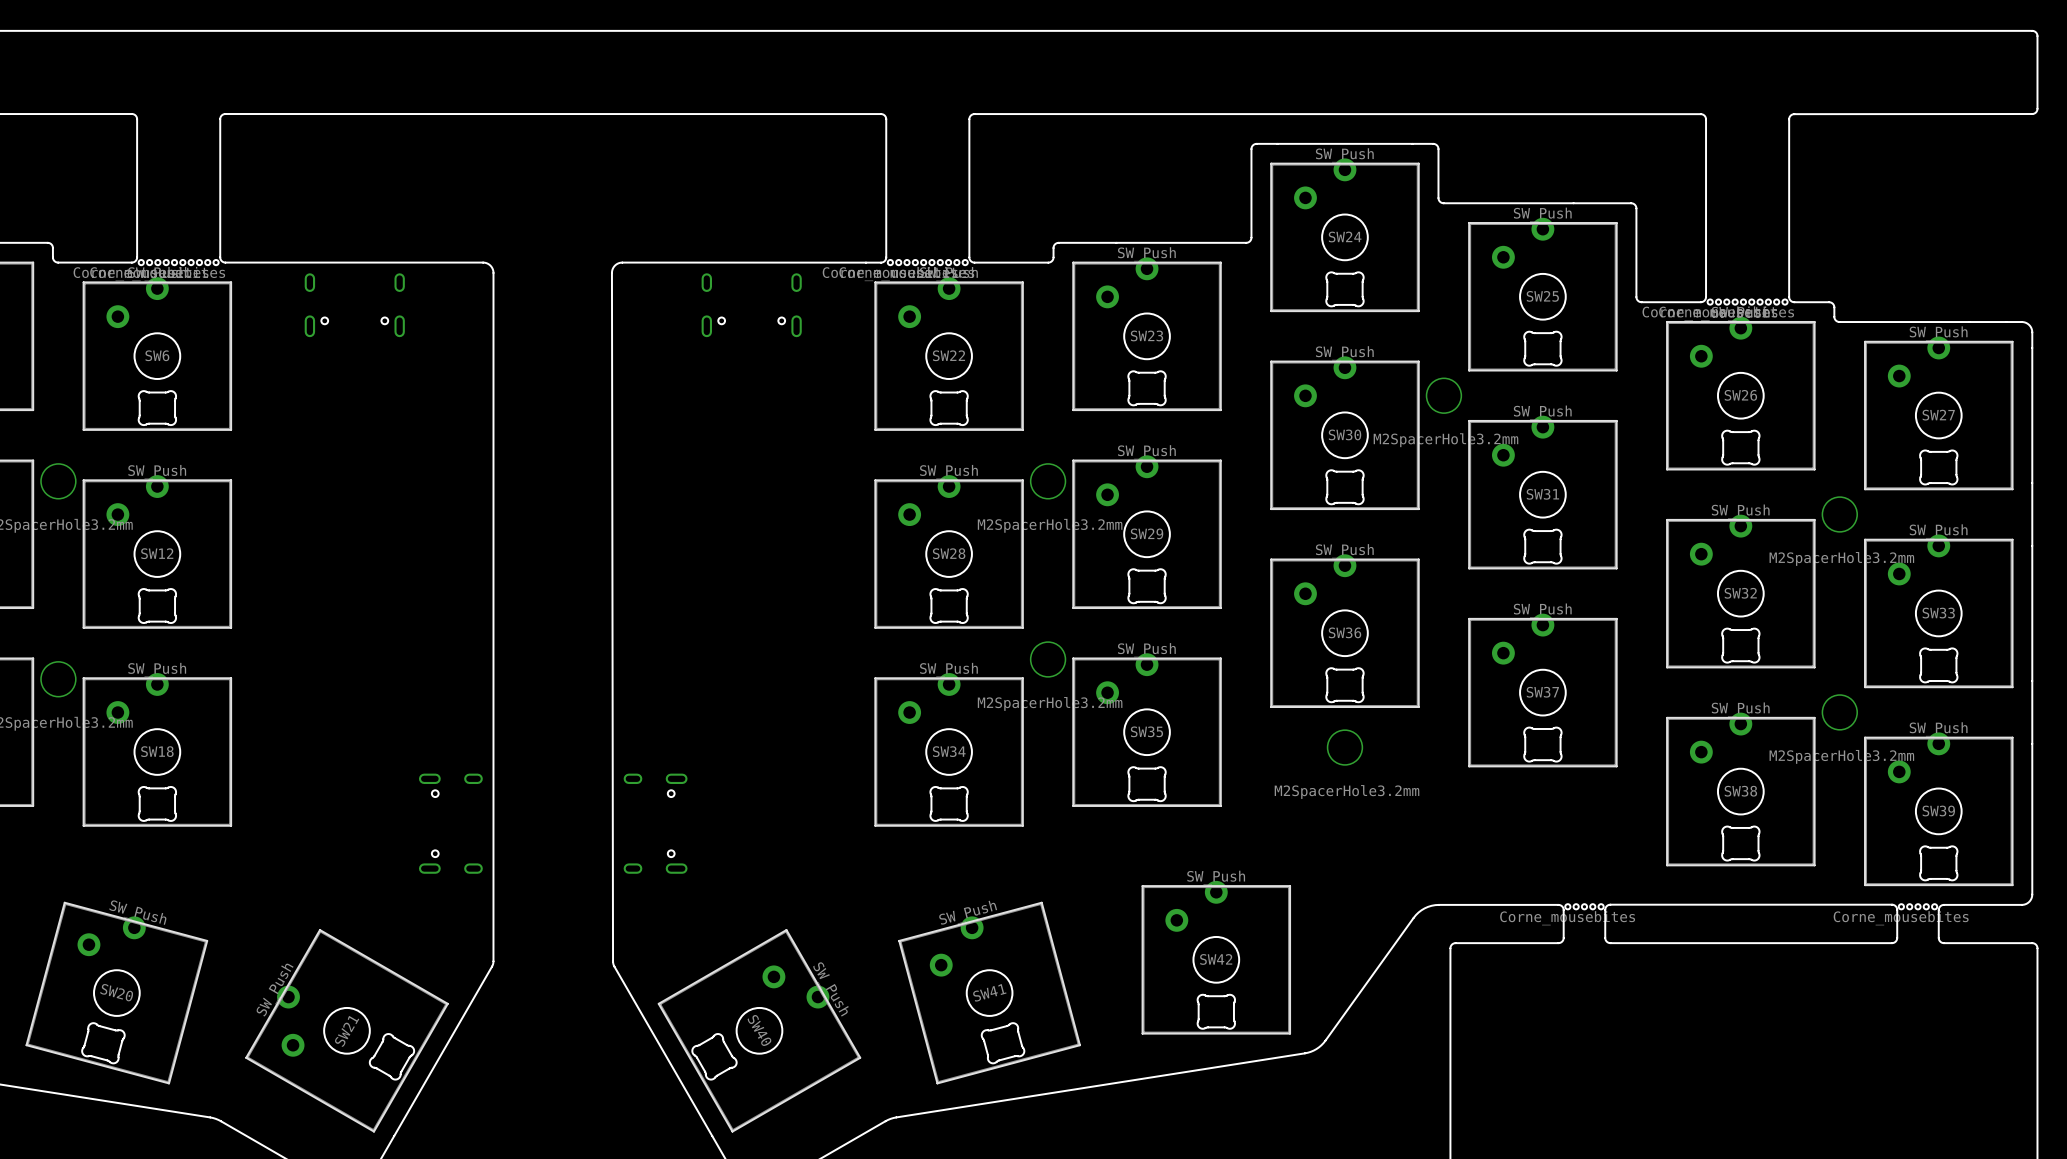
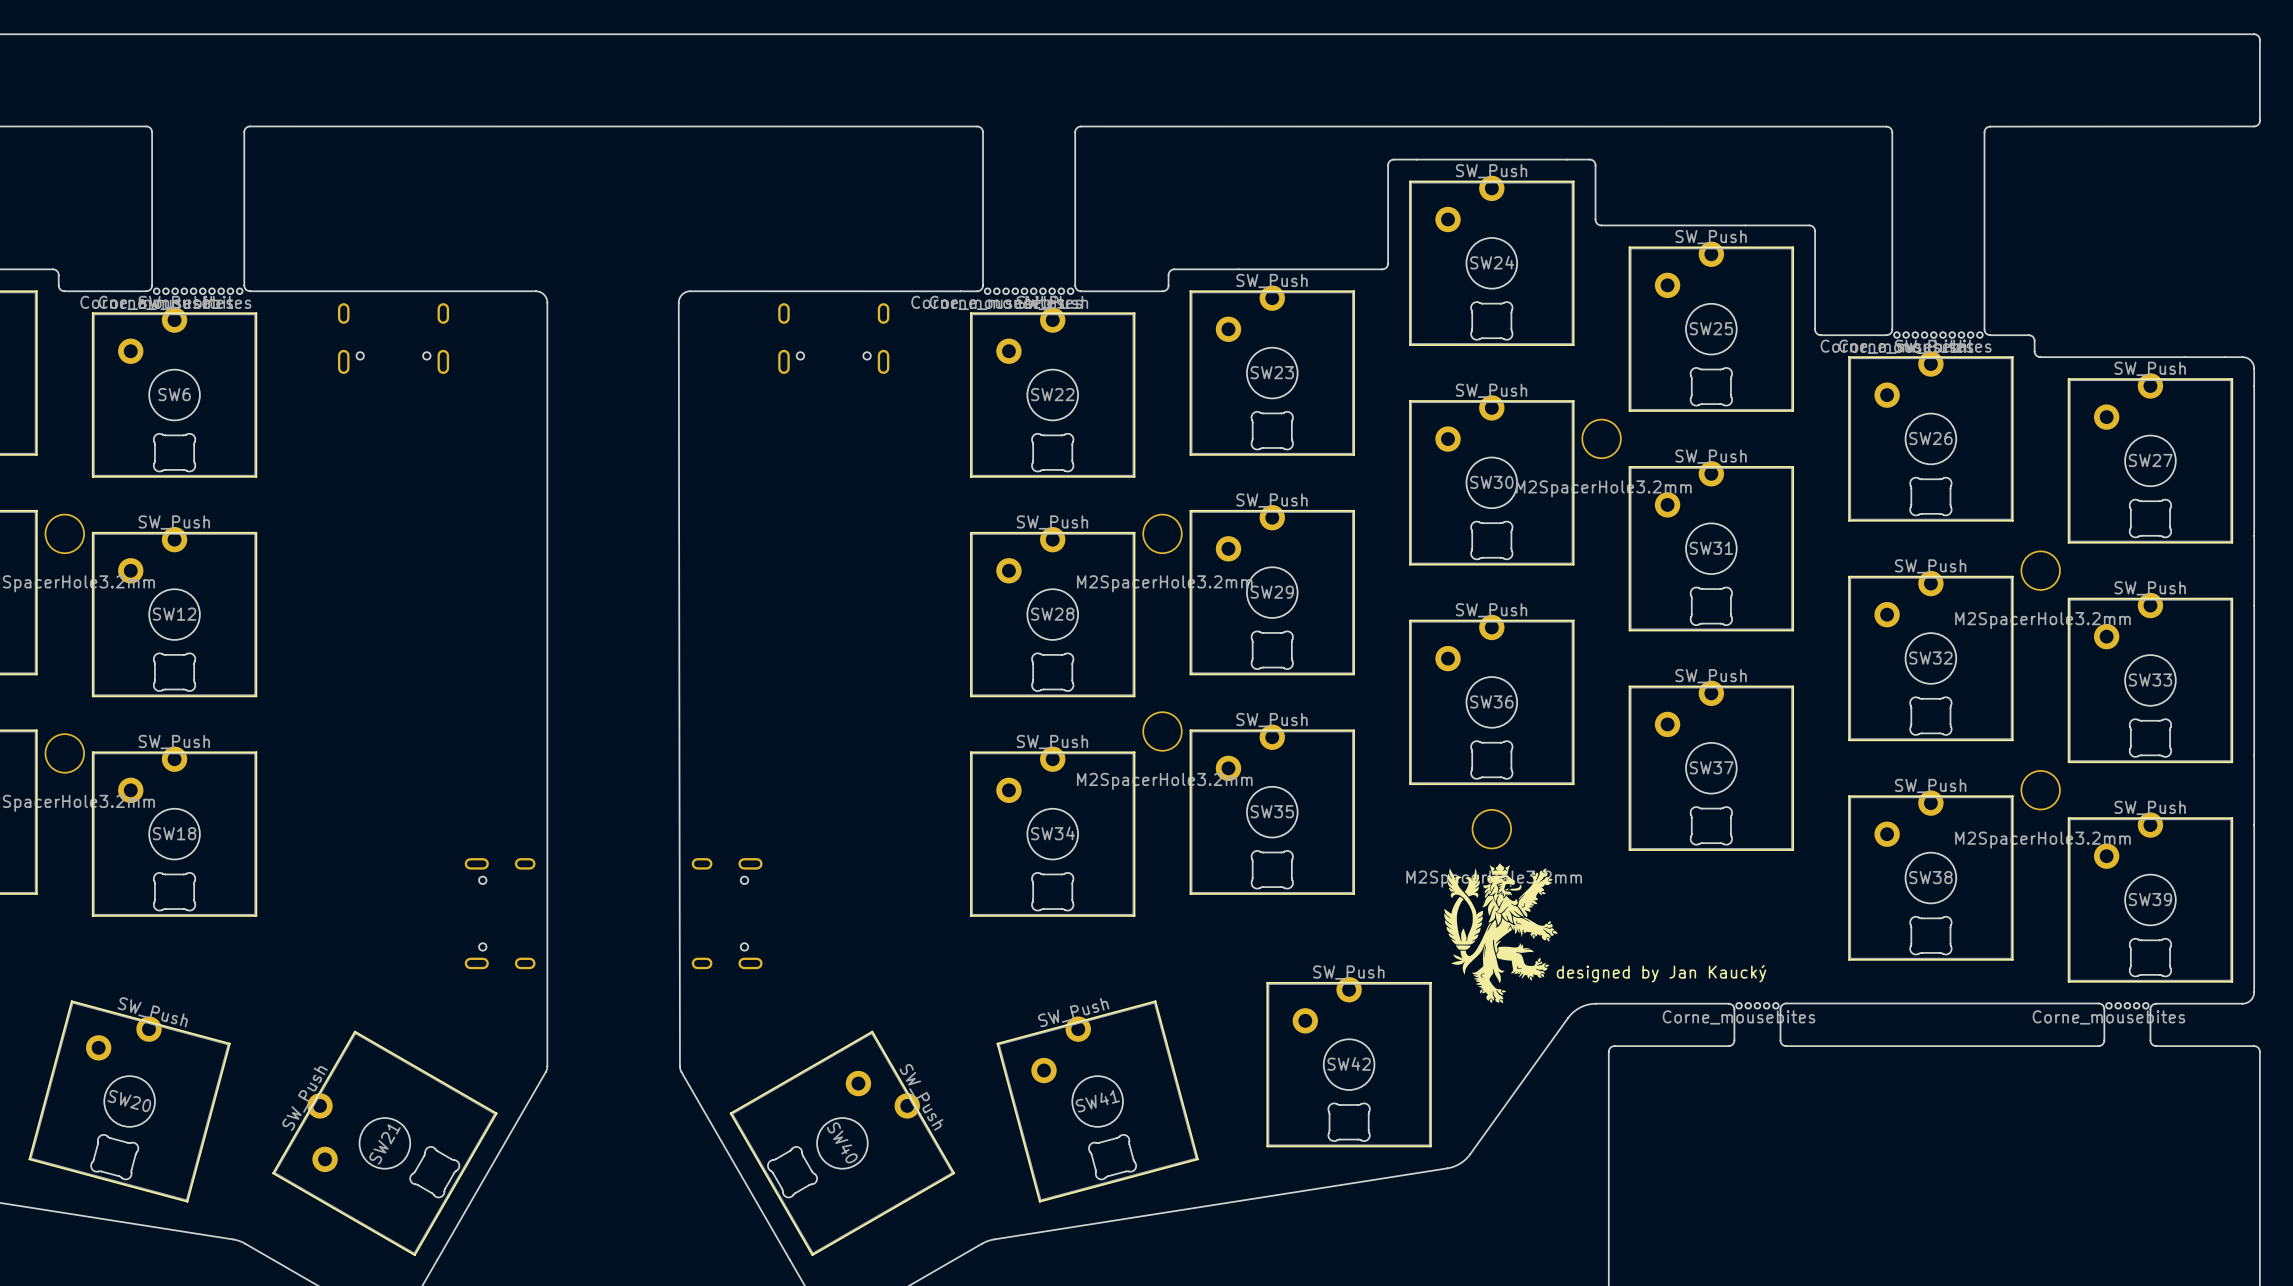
drawing: none -> [1444, 863, 1558, 1004]
text: none -> designed by Jan Kaucký (1661, 973)

